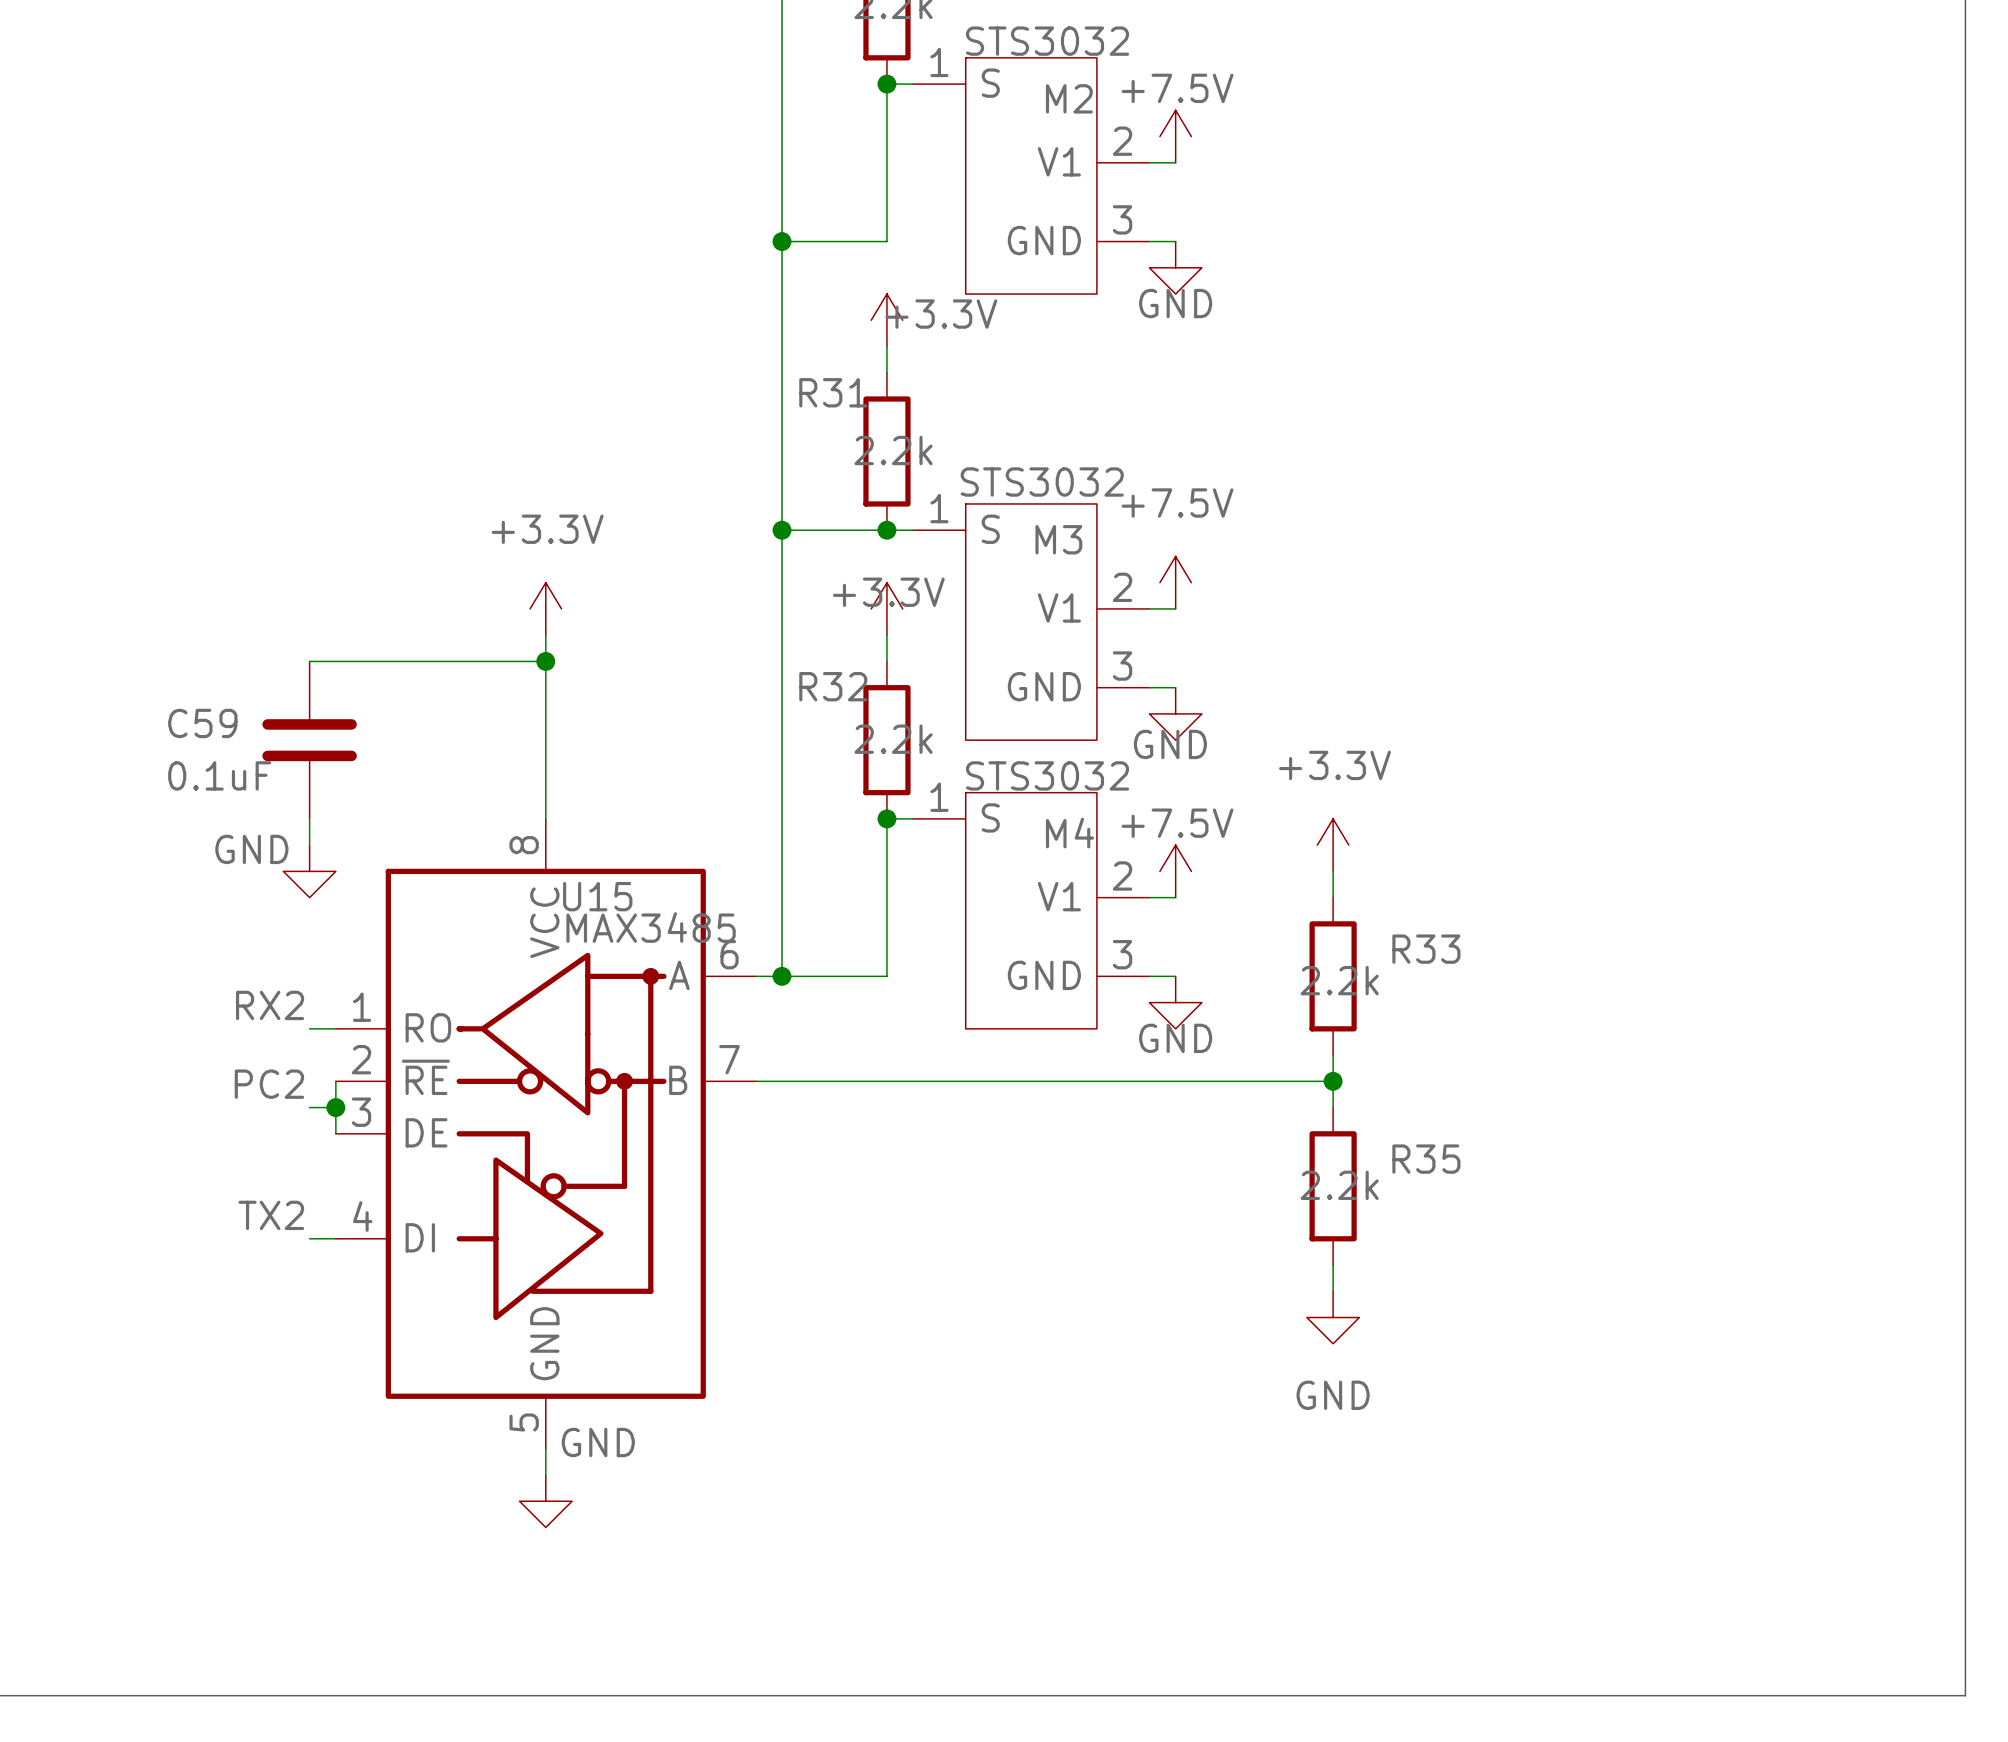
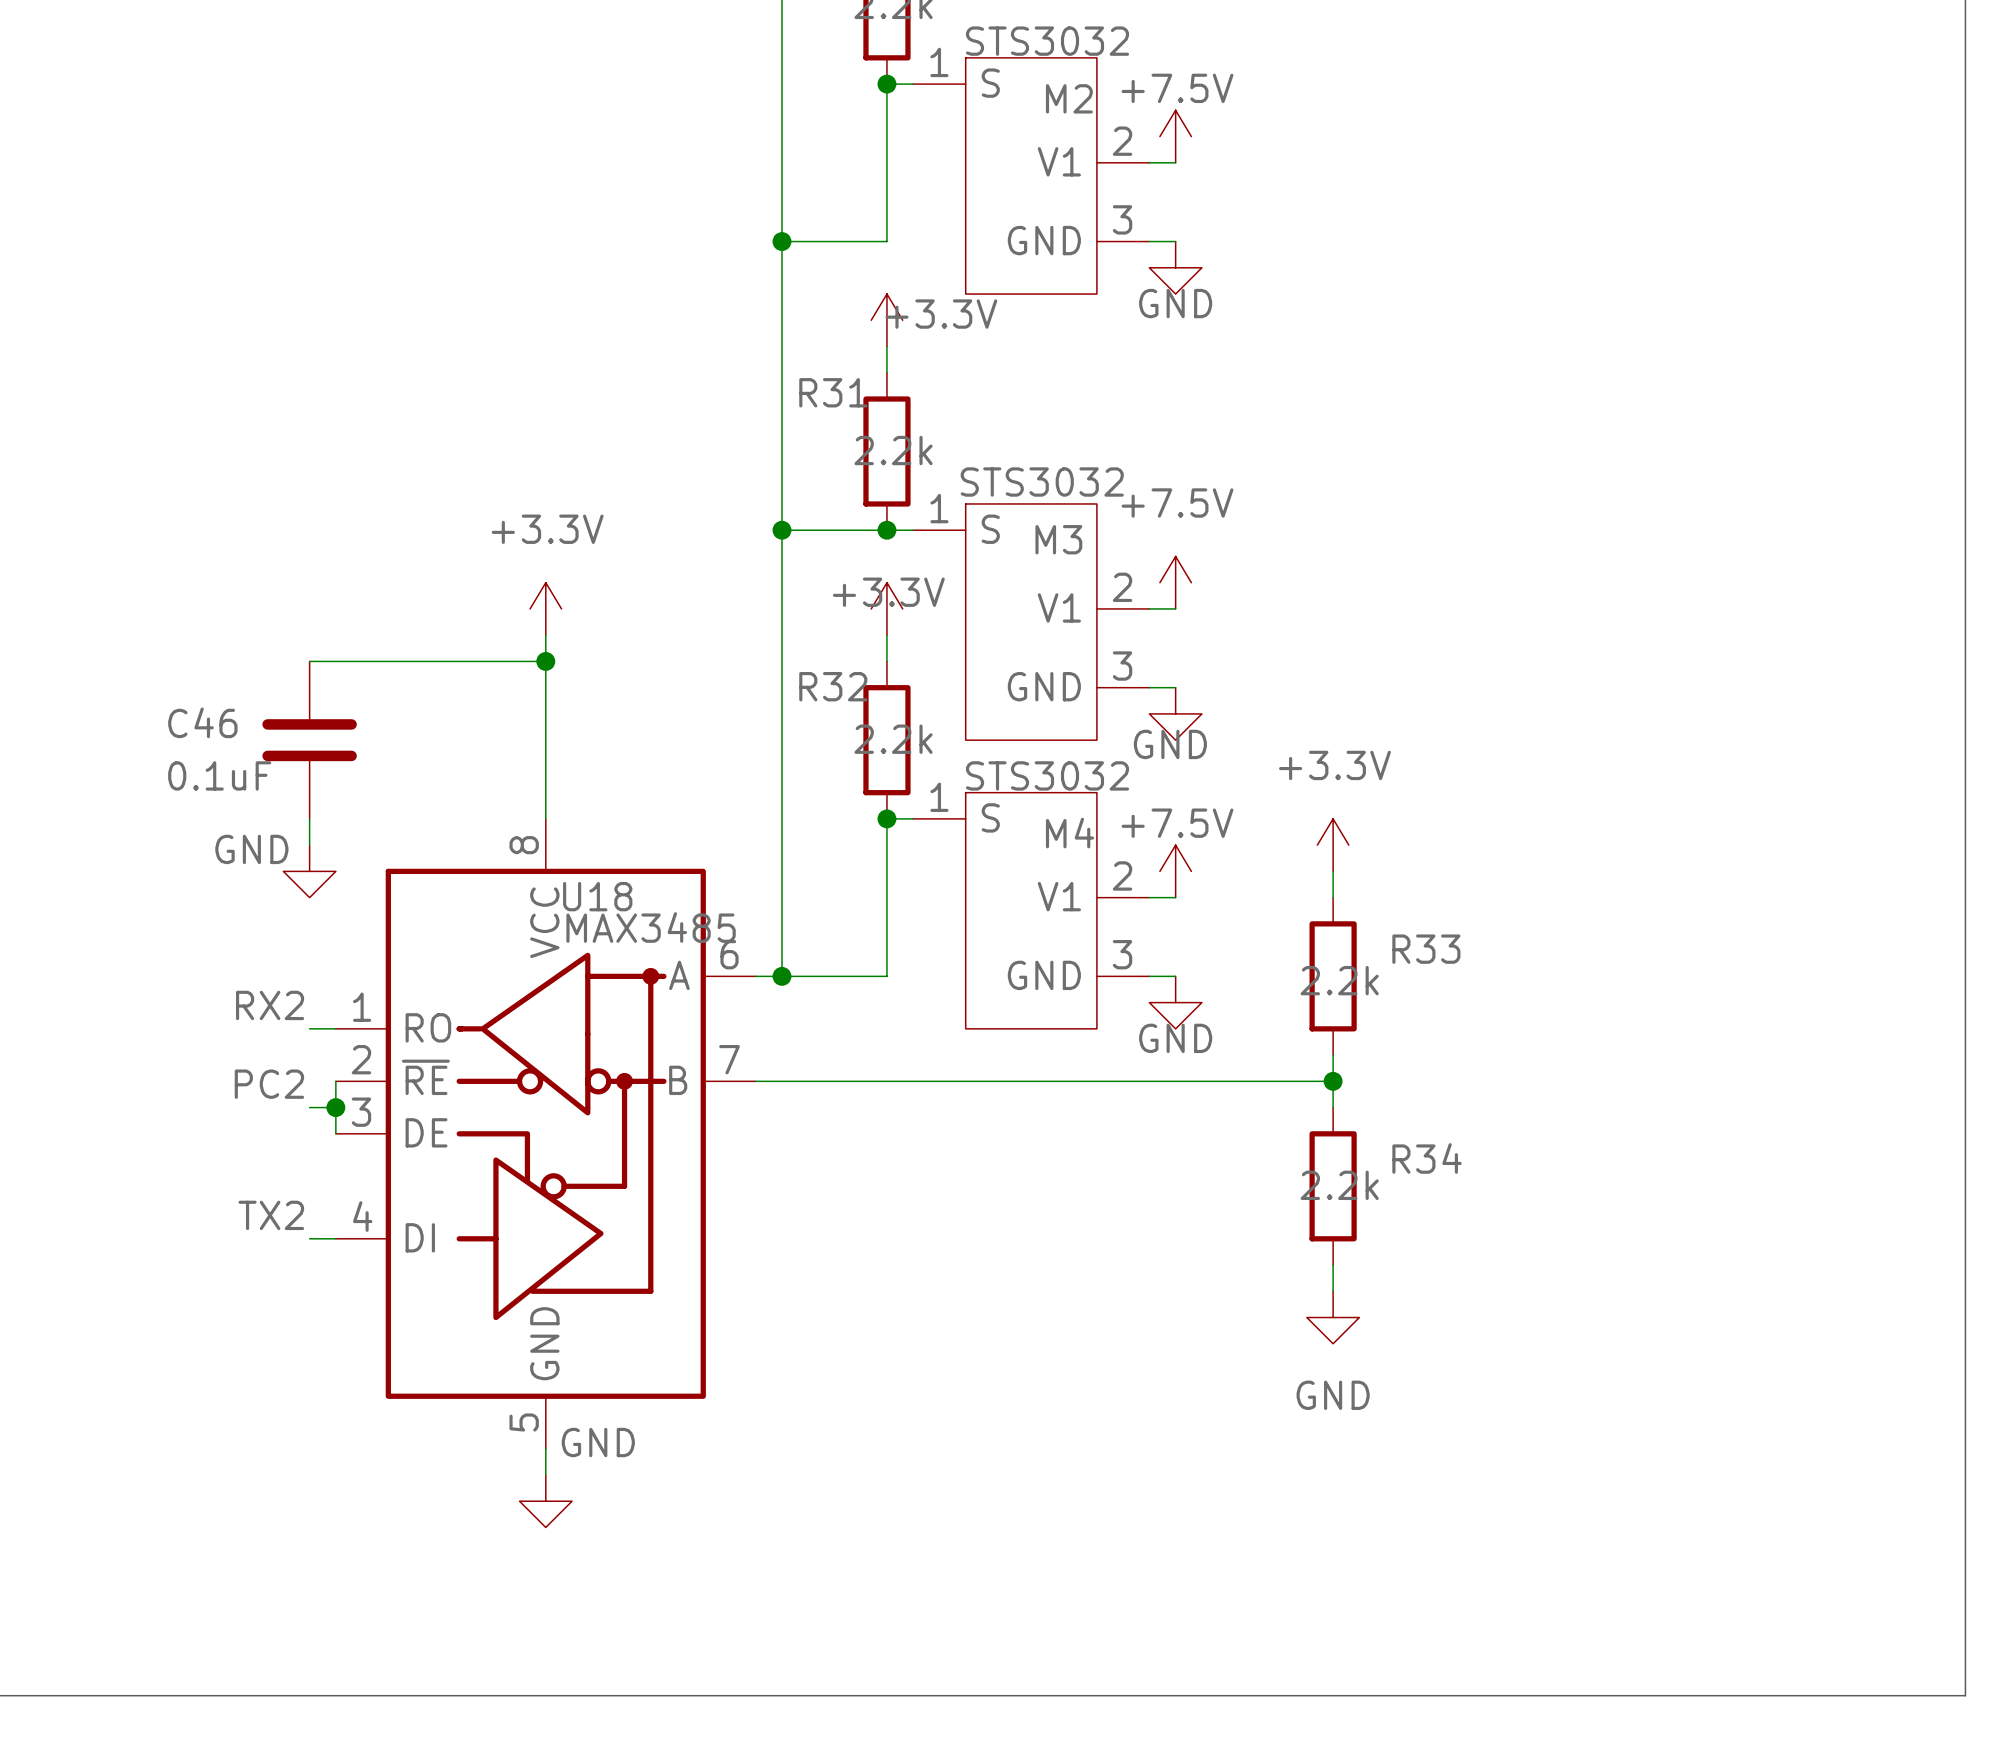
C59 name: C59 (202, 723) -> C46 (202, 722)
U15 name: U15 (597, 896) -> U18 (597, 896)
R35 name: R35 (1426, 1159) -> R34 (1427, 1158)

